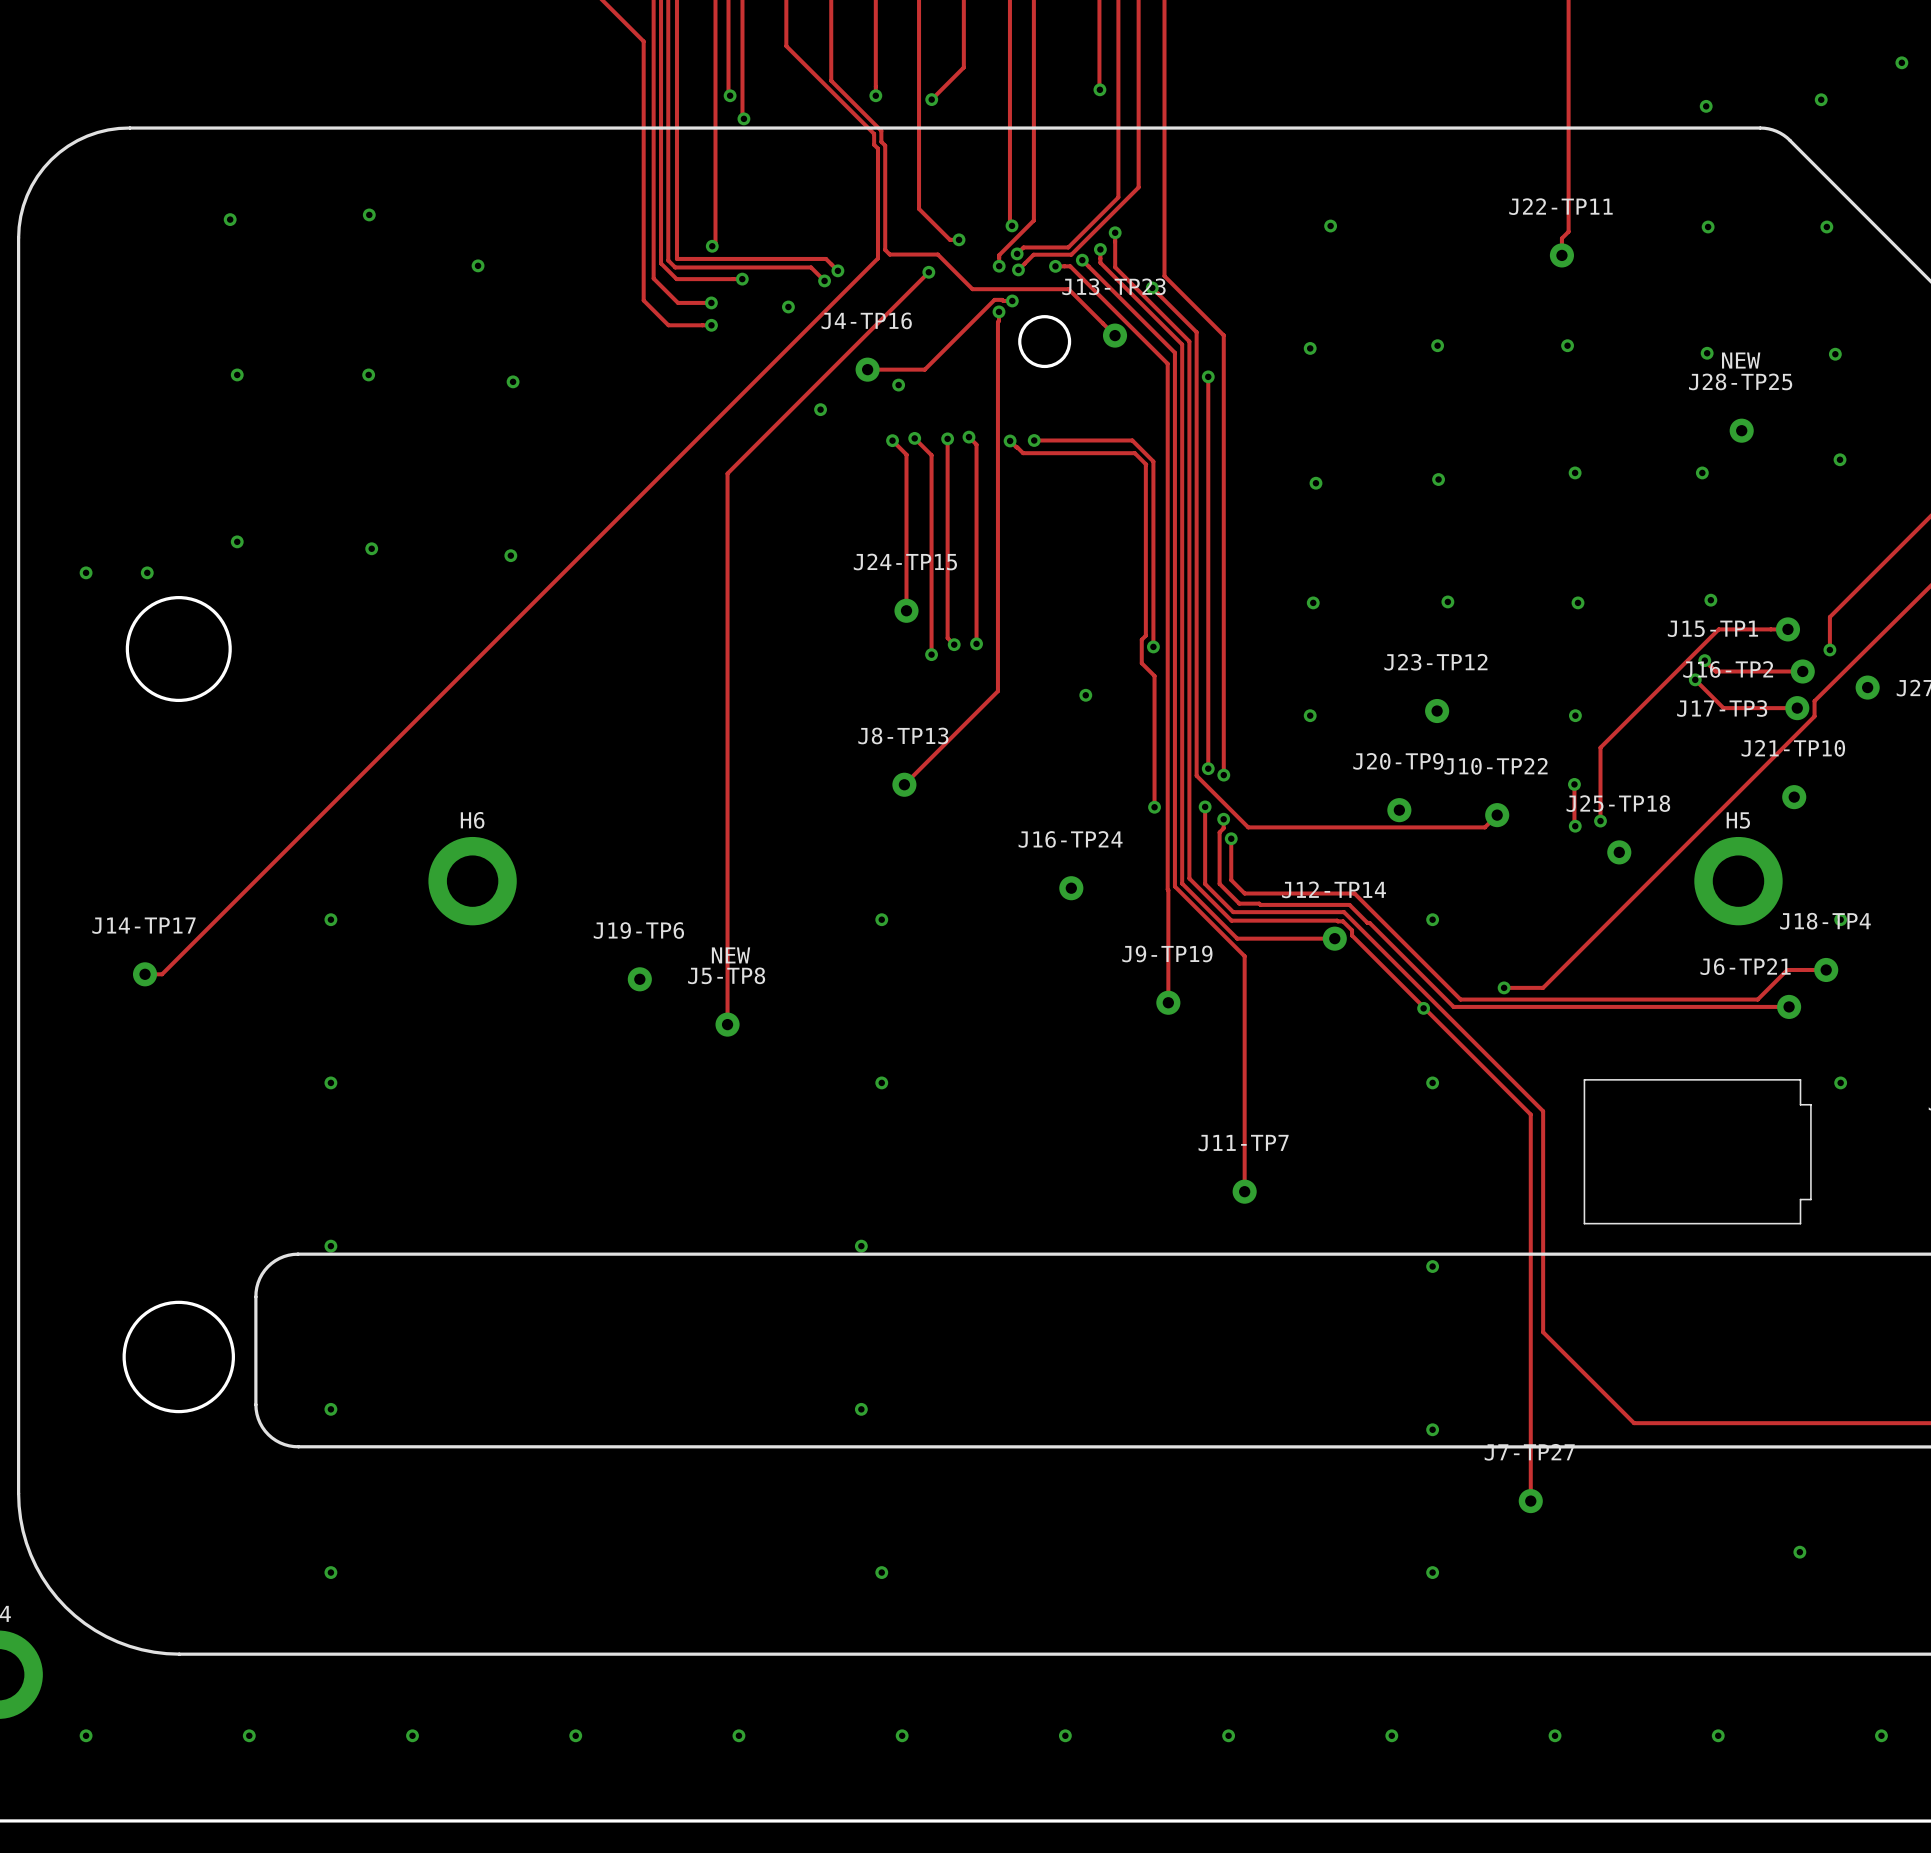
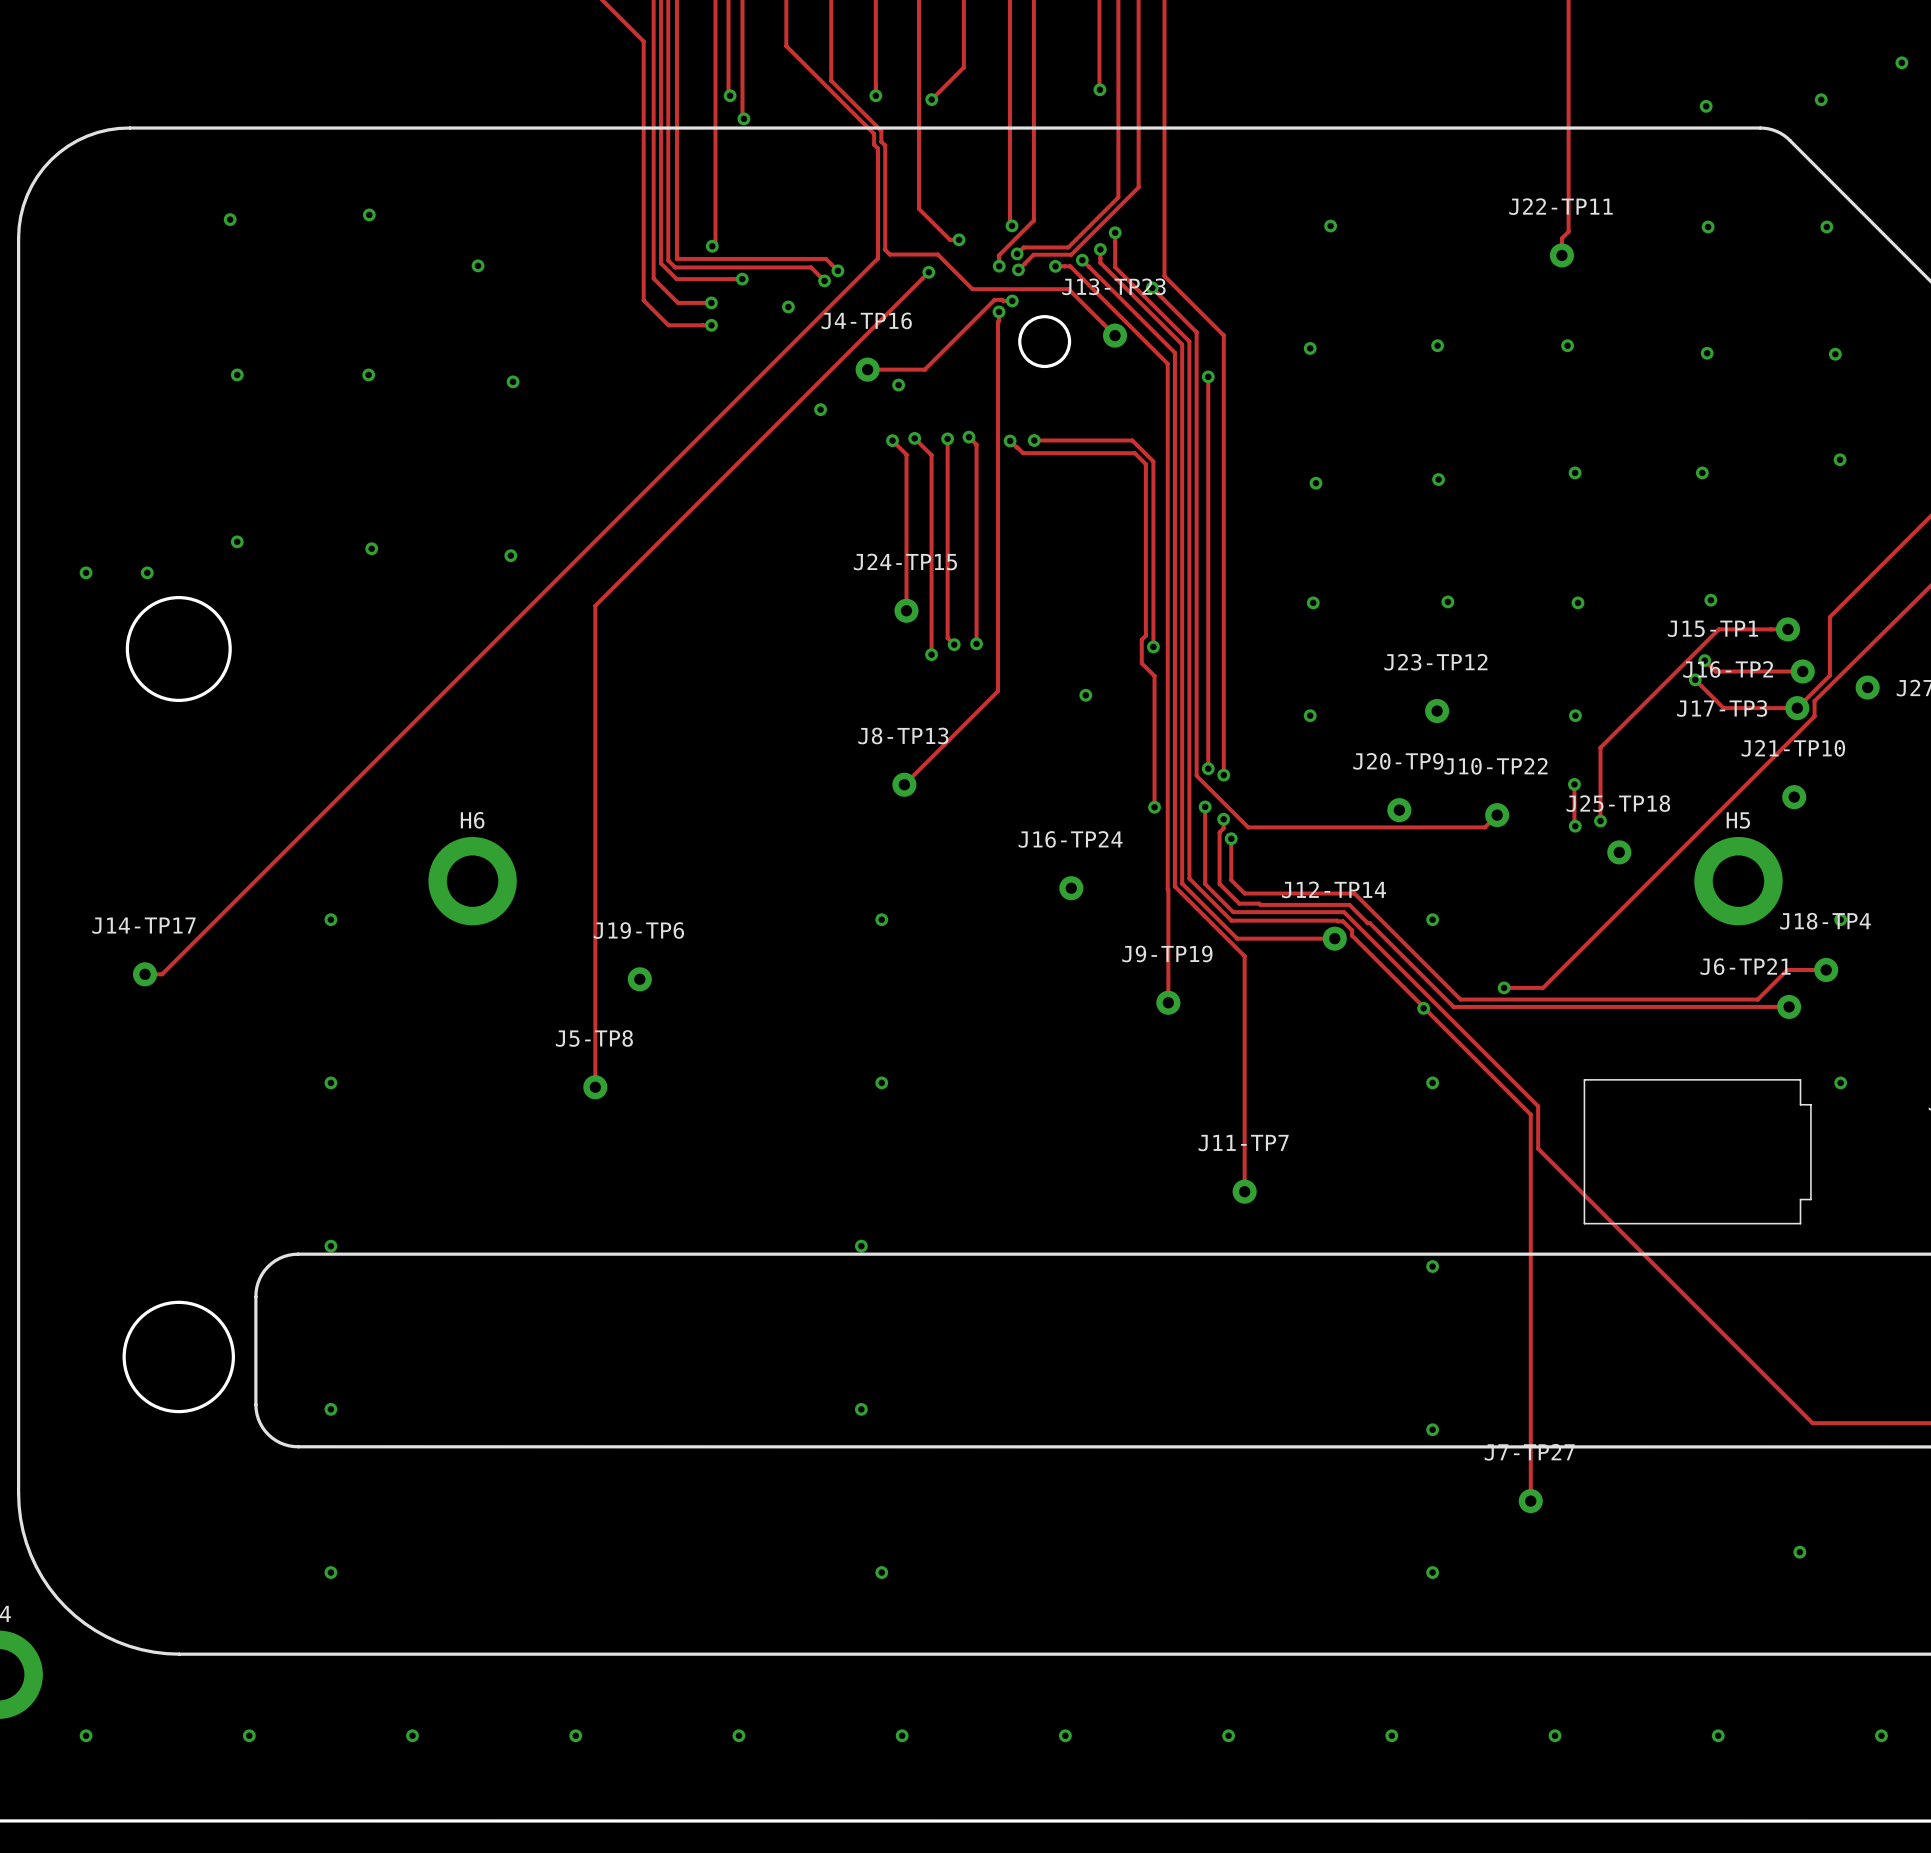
text: NEW (1741, 360) -> none
J28-TP25: (1741, 430) -> none
track: (727, 473) (727, 1024) -> (727, 473) (595, 605) (595, 1087)
track: none -> (1829, 649) (1829, 675) (1797, 708)
via: (1829, 649) -> none
text: NEW (731, 955) -> none
J5-TP8 position: (727, 1024) -> (595, 1087)
track: (1538, 1106) (1543, 1111) (1543, 1332) (1634, 1423) (1812, 1423) -> (1538, 1106) (1538, 1148) (1812, 1423)

